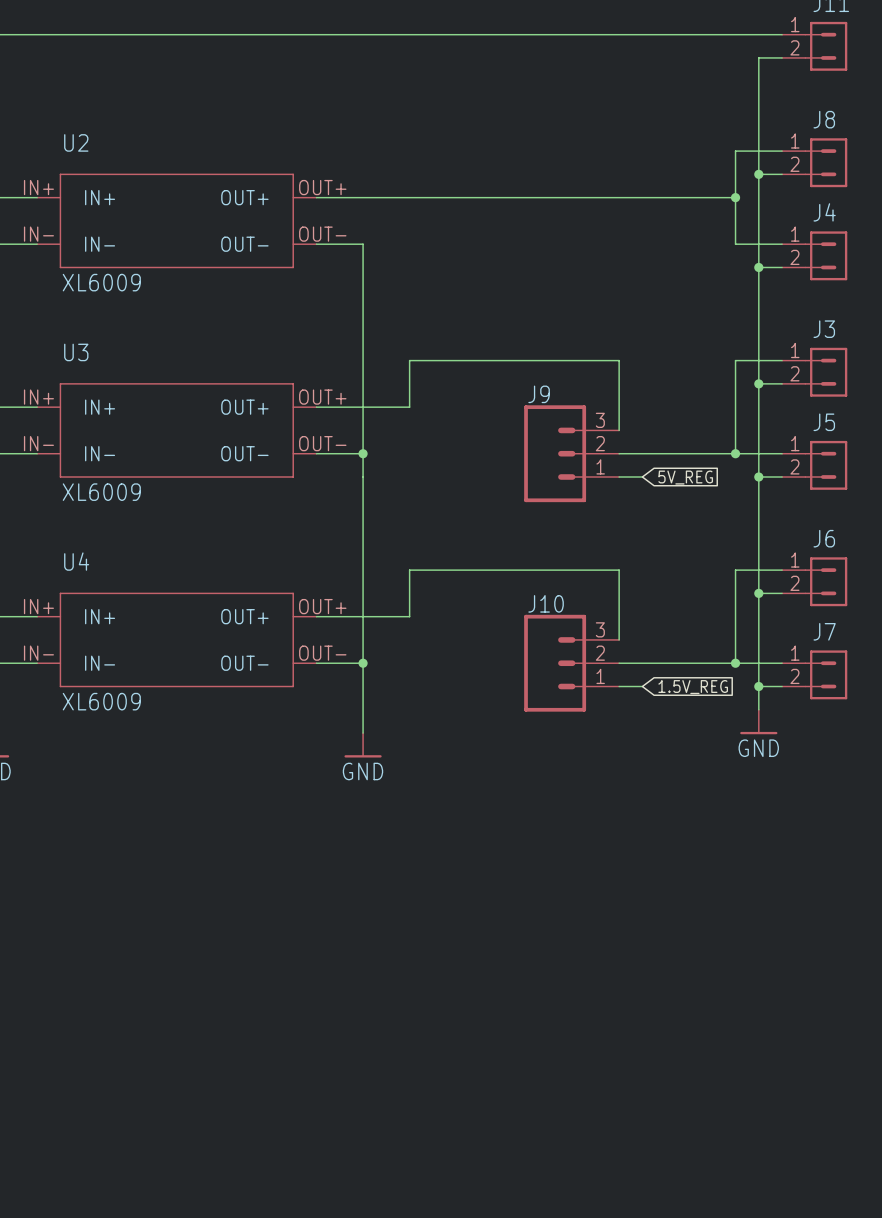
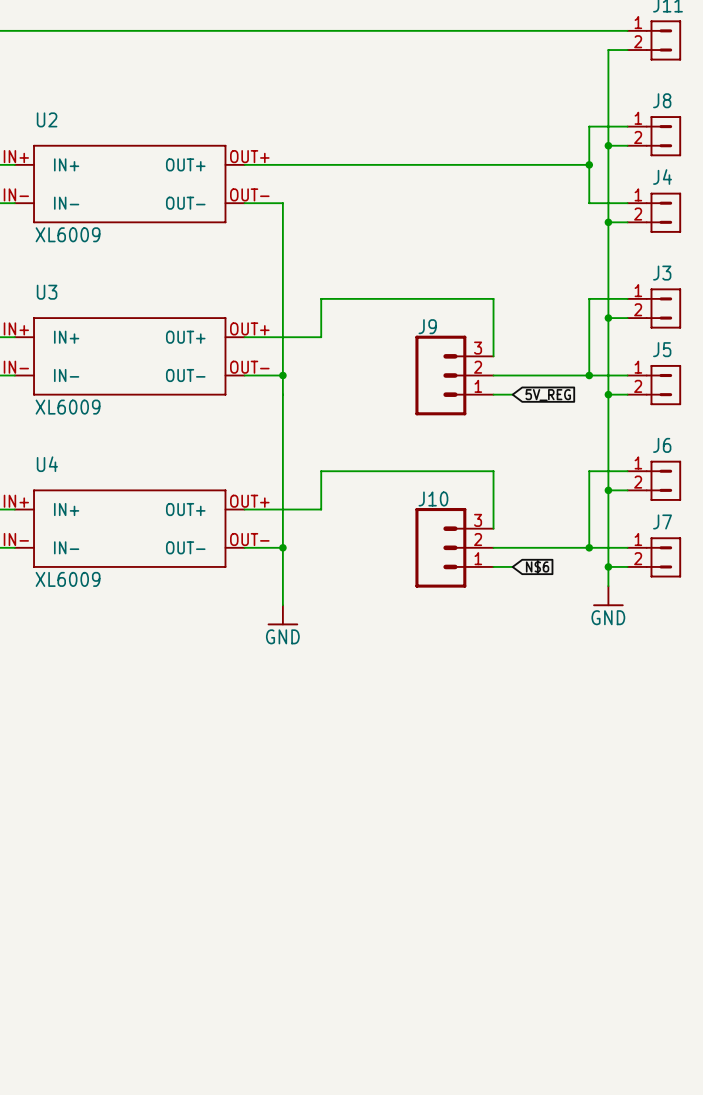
global label: 1.5V_REG (693, 687) -> N$6 (537, 566)

